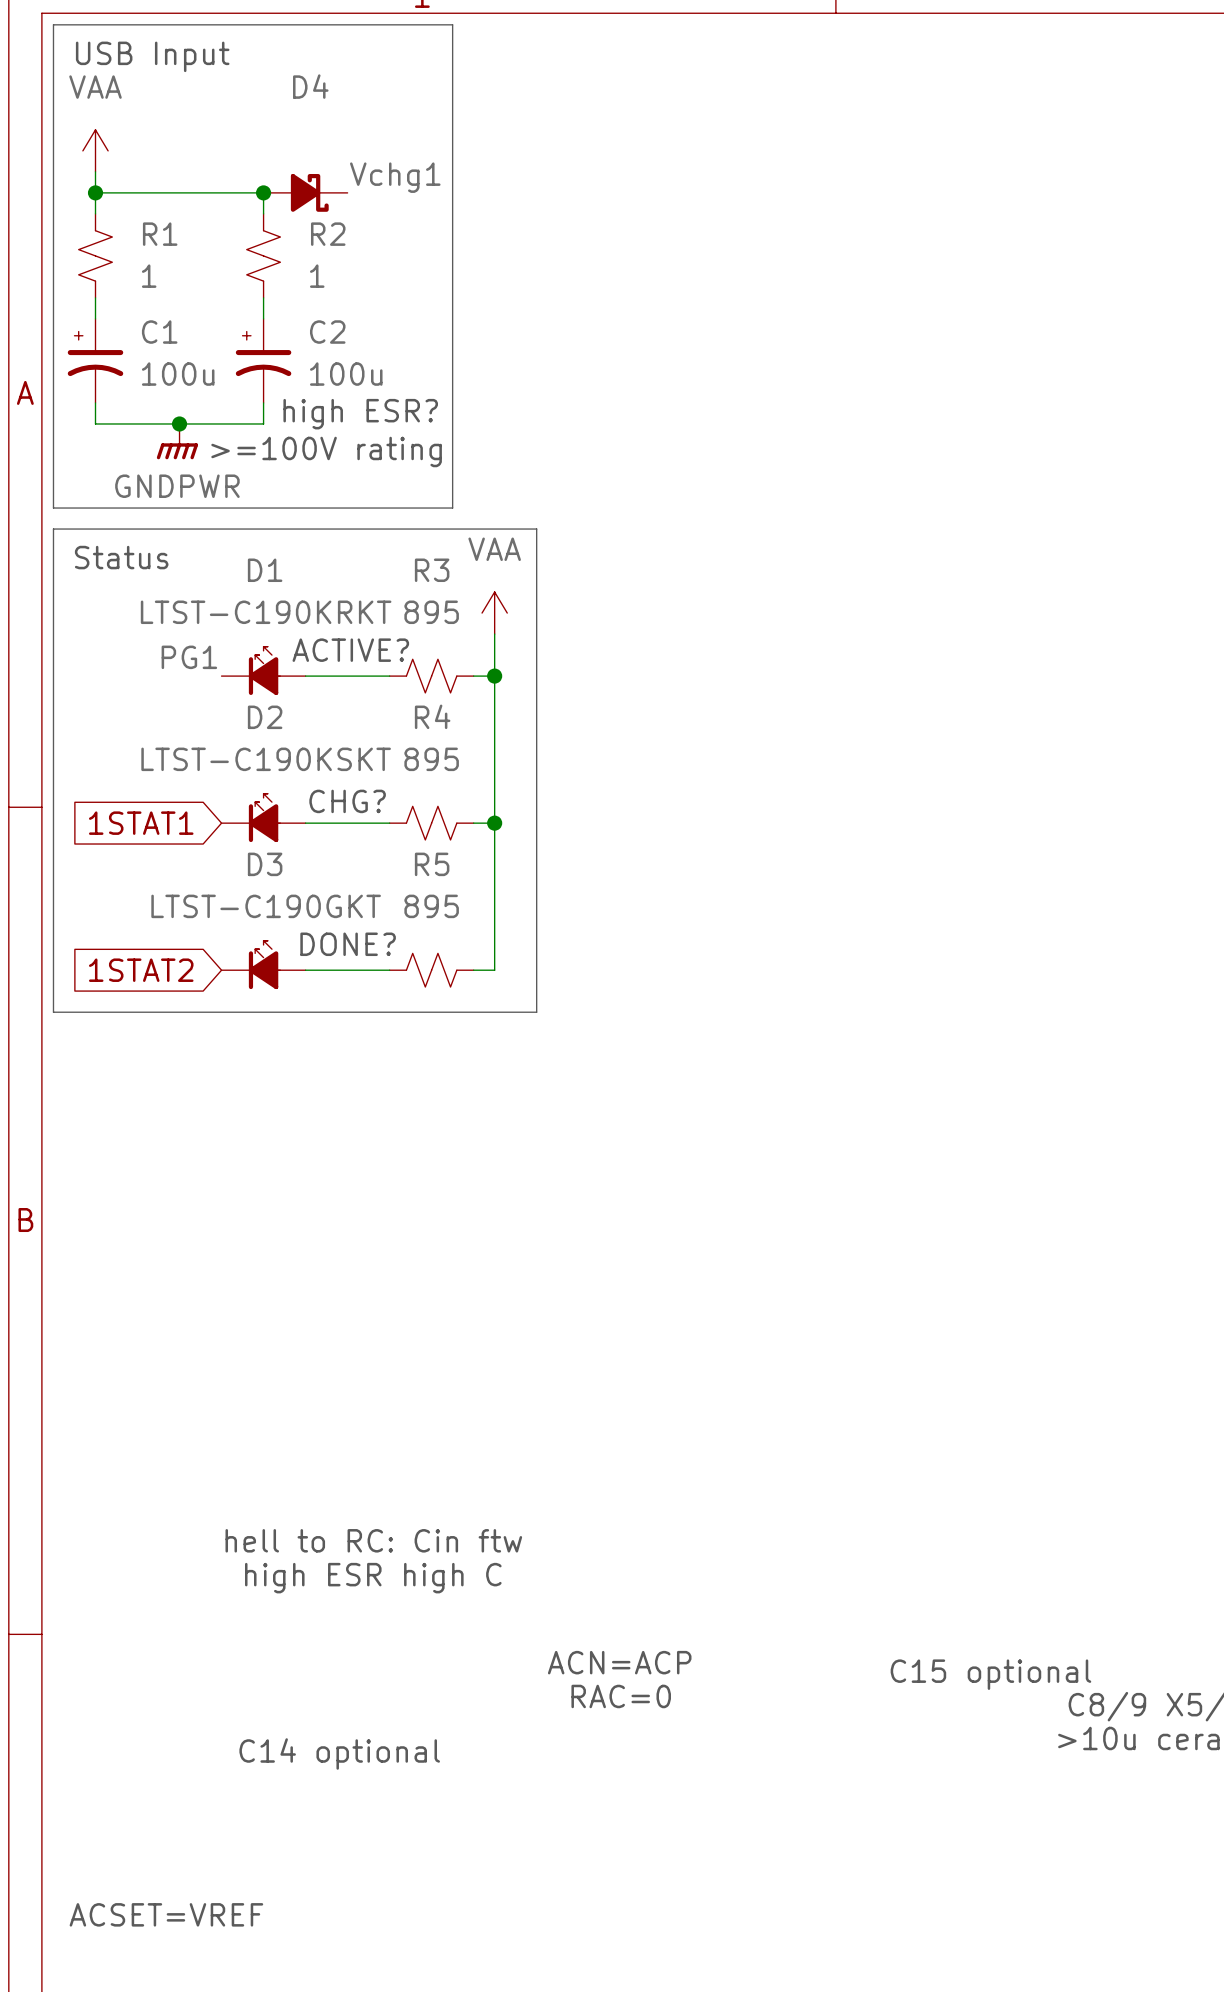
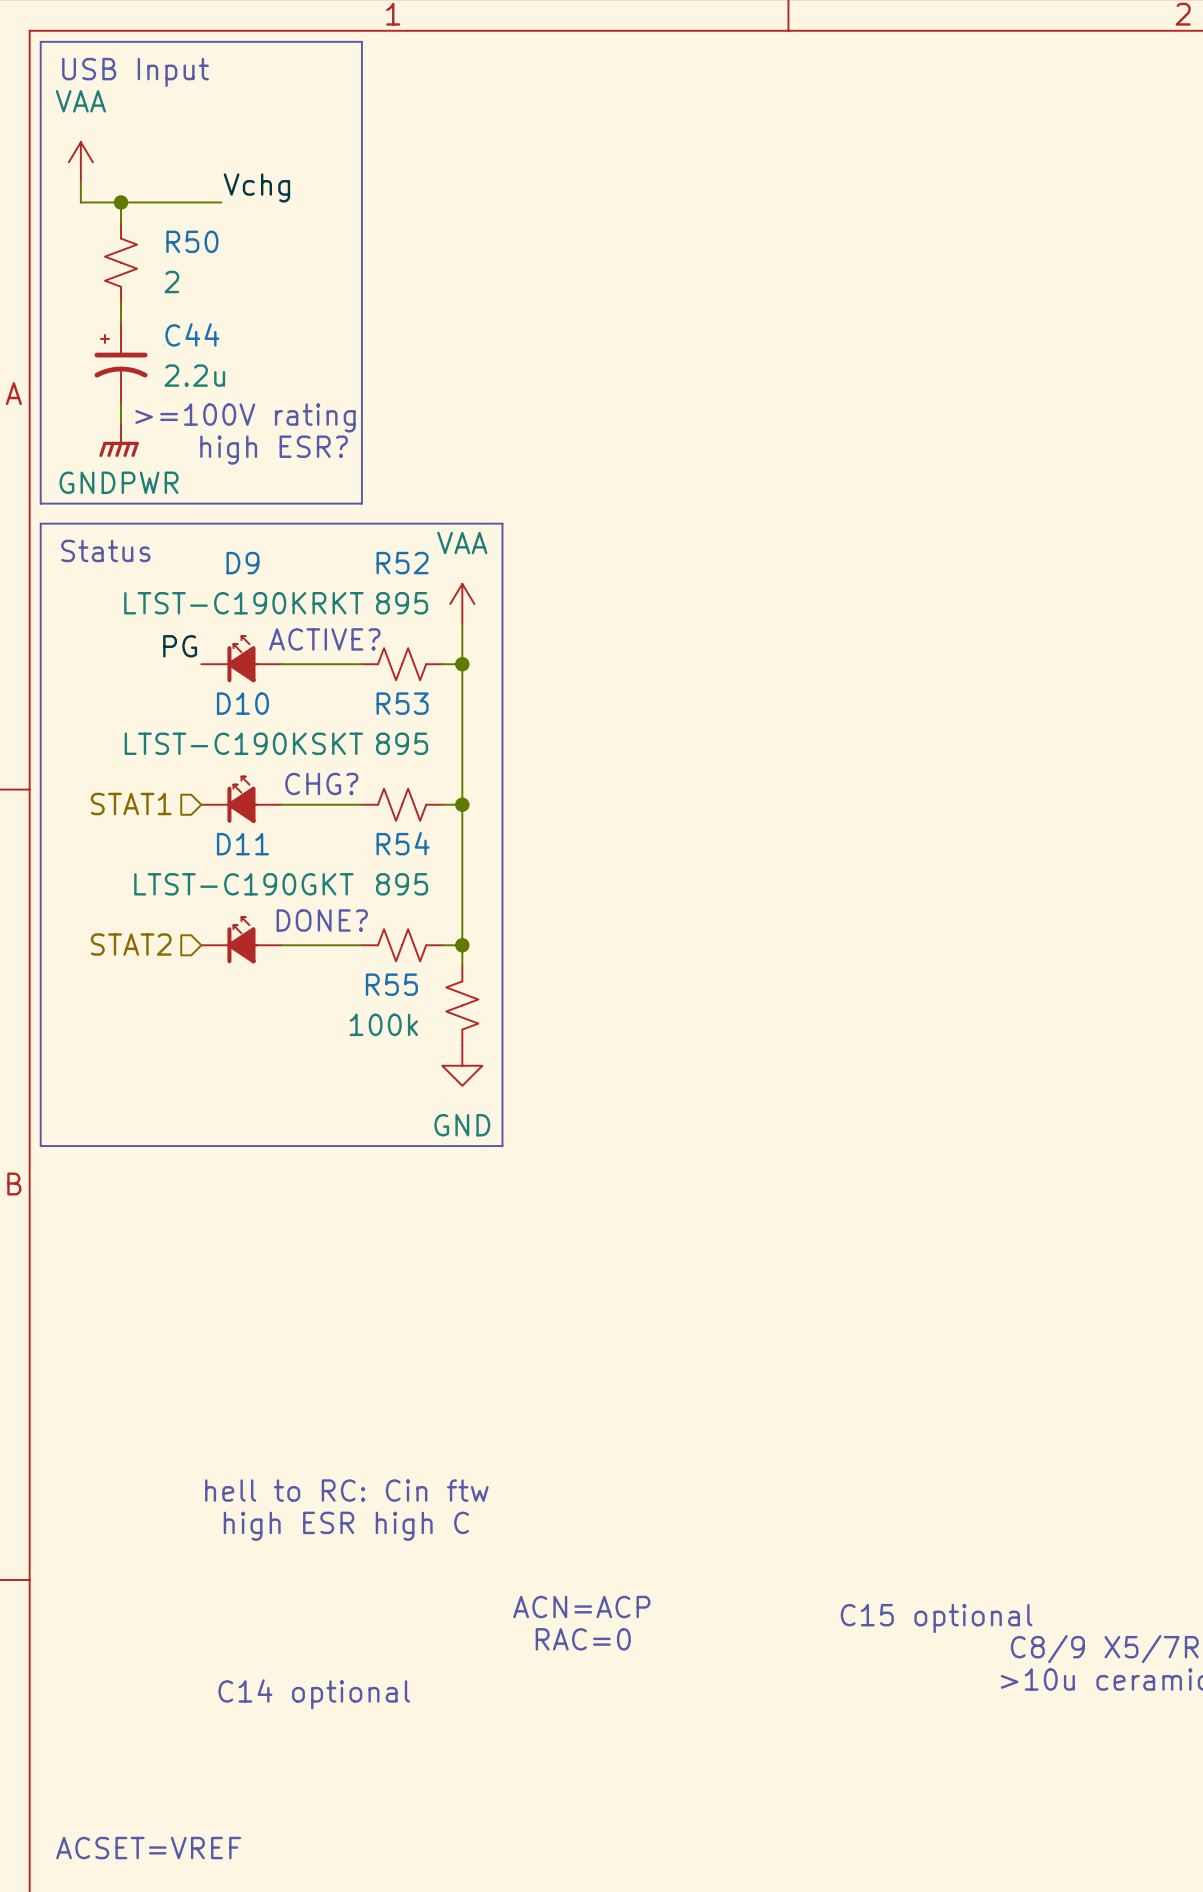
line: (389, 24) (452, 24) (452, 508) (389, 508) -> (361, 41) (361, 503)
label: none -> Vchg (256, 187)
label: Vchg1 (395, 177) -> none
wire: (95, 192) (95, 213) -> (121, 202) (121, 222)
junction position: (95, 192) -> (121, 202)
wire: (242, 192) (263, 192) (263, 213) -> none
junction: (263, 192) -> none
D4: (305, 192) -> none
R1: 1 (95, 255) -> none
R50: none -> 2 (121, 262)
R2: 1 (263, 255) -> none
wire: (95, 297) (95, 318) -> (121, 302) (121, 322)
wire: (263, 297) (263, 318) -> (121, 403) (121, 423)
C1: 100u (95, 360) -> none
C44: none -> 2.2u (121, 363)
C2: 100u (263, 360) -> none
wire: (95, 402) (95, 423) (263, 423) (263, 402) -> none
text position: high ESR? (360, 414) -> high ESR? (274, 450)
junction: (179, 423) -> none
power symbol position: GNDPWR (177, 441) -> GNDPWR (119, 440)
text position: >=100V rating (326, 451) -> >=100V rating (245, 417)
D1 name: D1 (265, 570) -> D9 (242, 563)
R3 name: R3 (432, 570) -> R52 (402, 563)
label: PG1 (189, 657) -> PG (180, 646)
R4 name: R4 (432, 716) -> R53 (402, 703)
D2 name: D2 (265, 717) -> D10 (242, 703)
hierarchical label: none -> STAT1 (131, 804)
global label: 1STAT1 (141, 823) -> none
D3 name: D3 (265, 864) -> D11 (242, 844)
R5 name: R5 (432, 864) -> R54 (403, 843)
hierarchical label: none -> STAT2 (131, 944)
global label: 1STAT2 (141, 970) -> none
wire: none -> (462, 945) (462, 965)
junction: none -> (462, 945)
line: (53, 1012) (536, 1012) -> (40, 985) (40, 1146) (502, 1146) (502, 985)
R55: none -> 100k (462, 1005)
power symbol: none -> GND (462, 1065)

